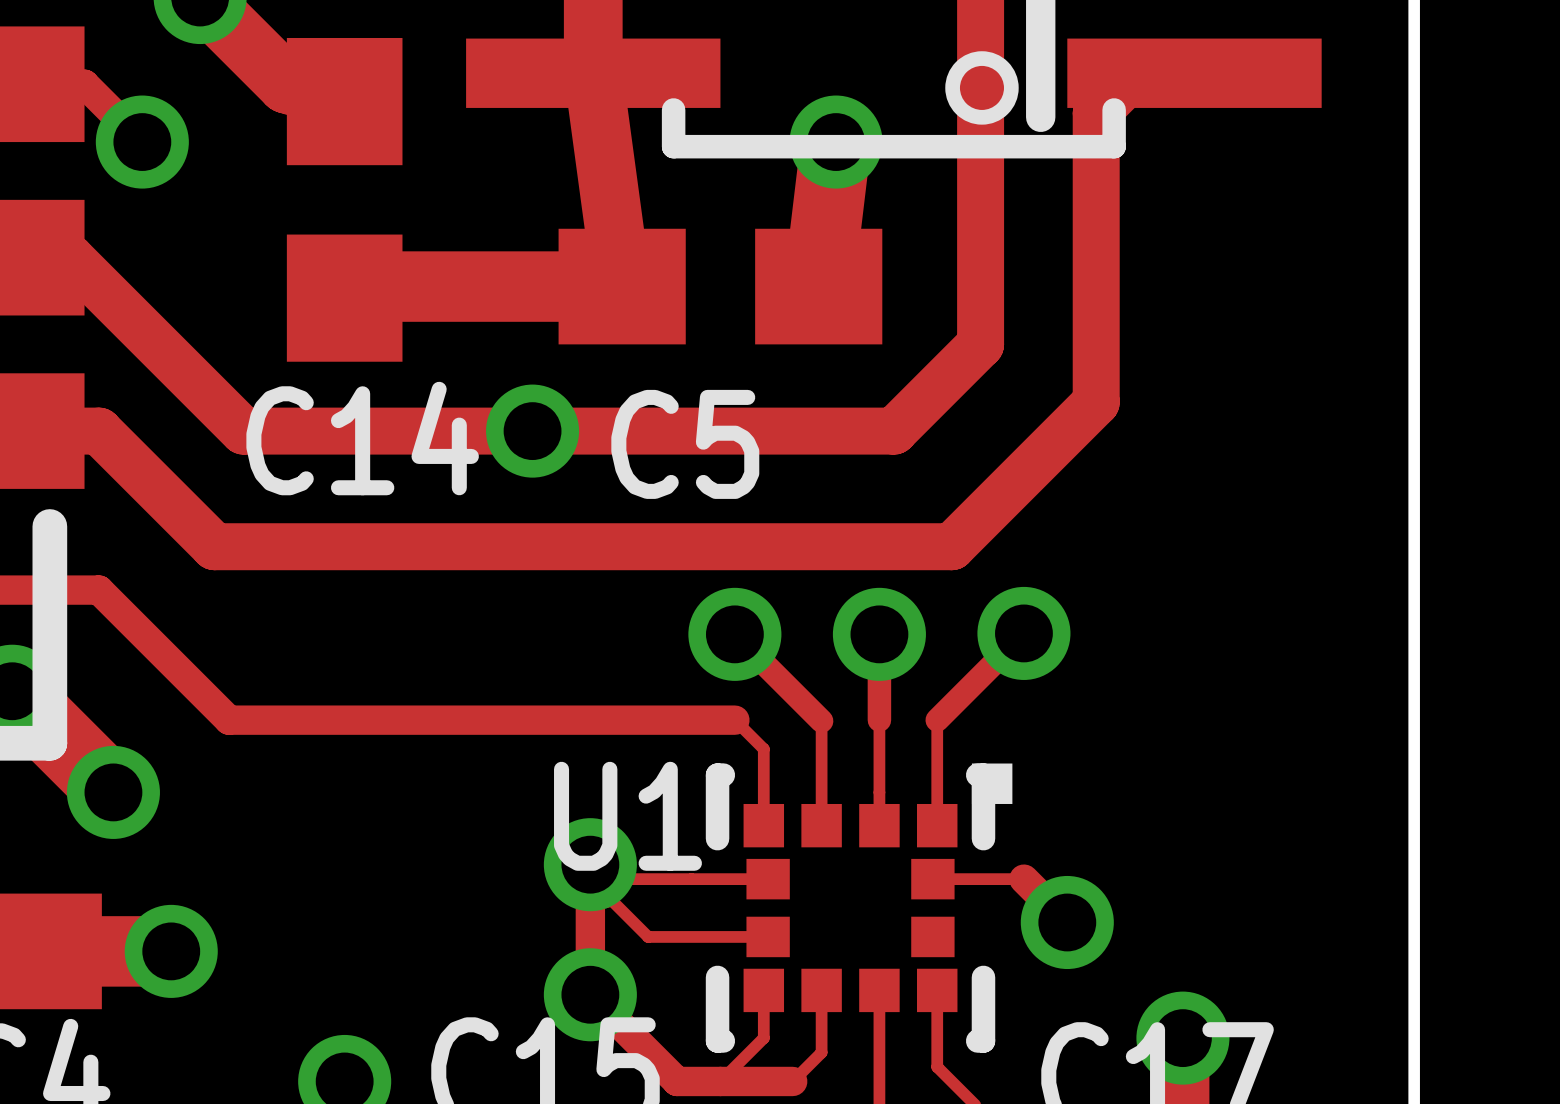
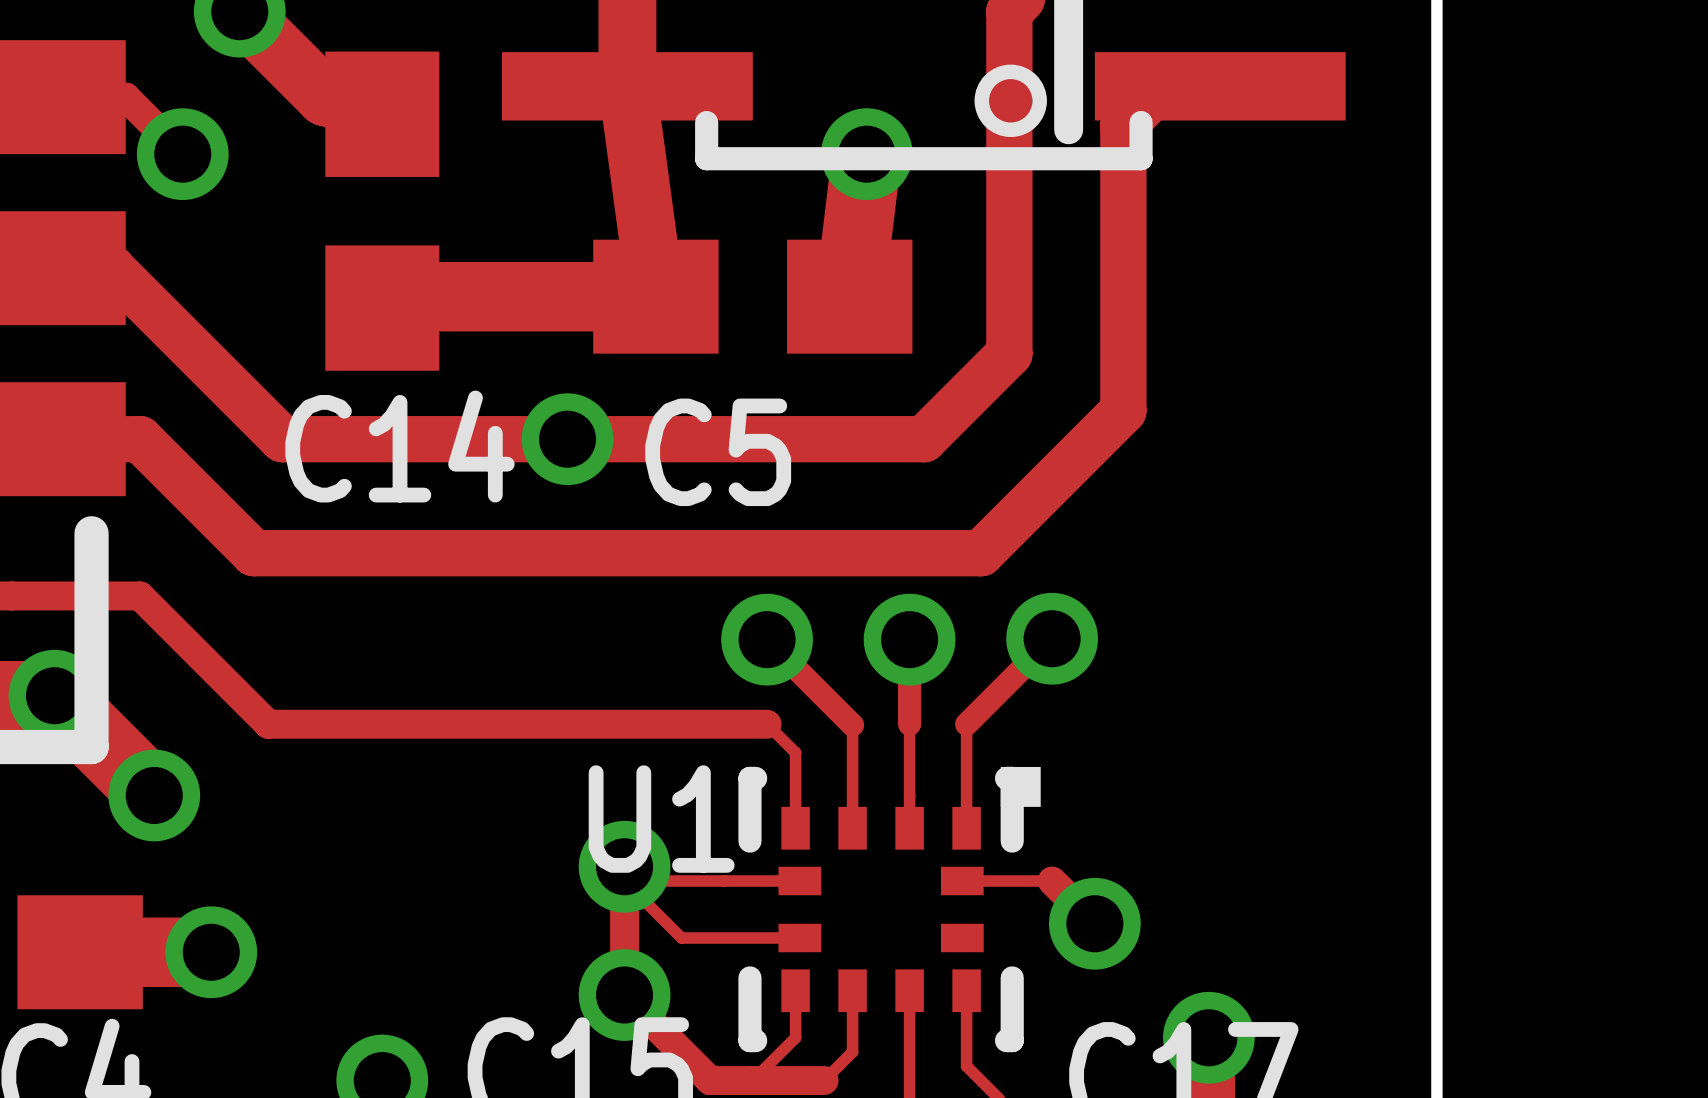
U1 footprint: [705, 763, 1013, 1053] -> [738, 766, 1041, 1053]

